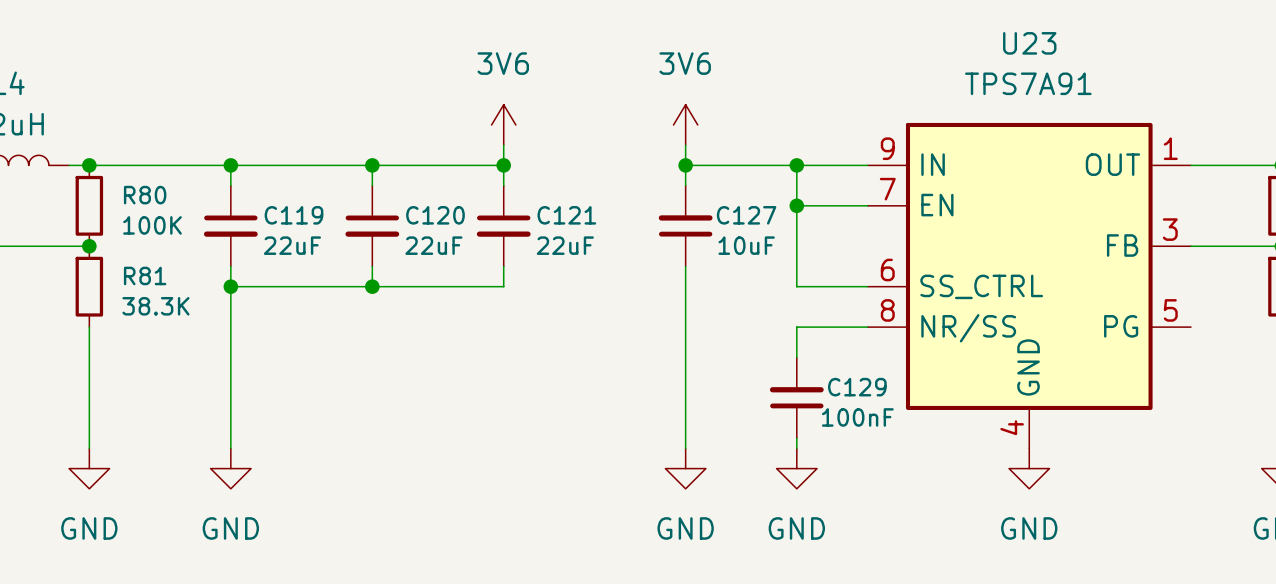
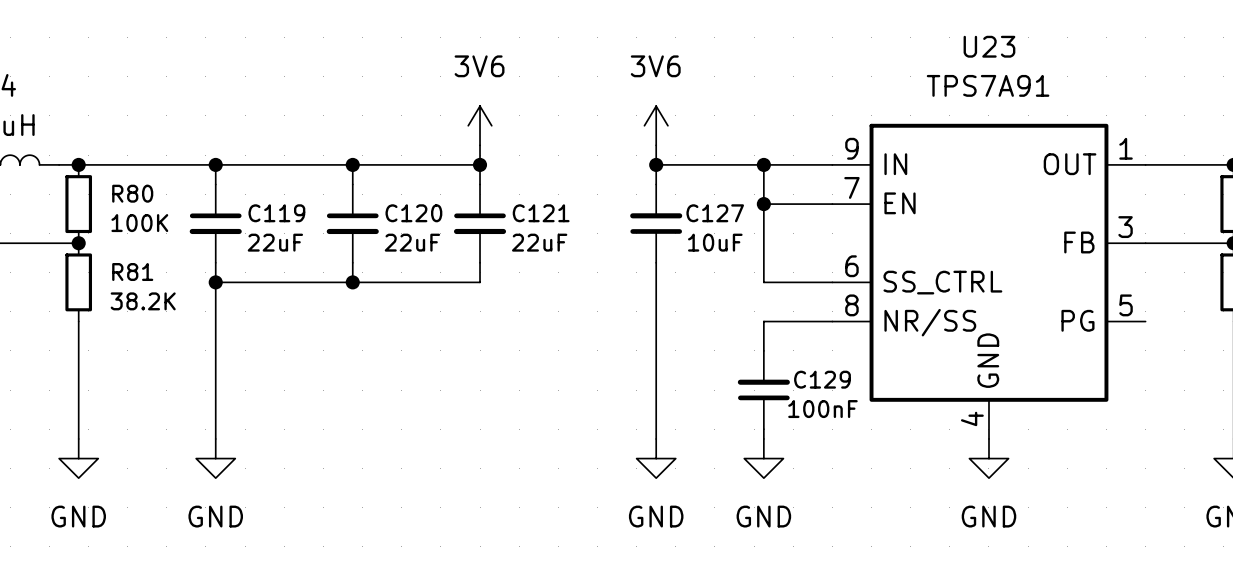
R81 value: 38.3K (155, 306) -> 38.2K (143, 301)

